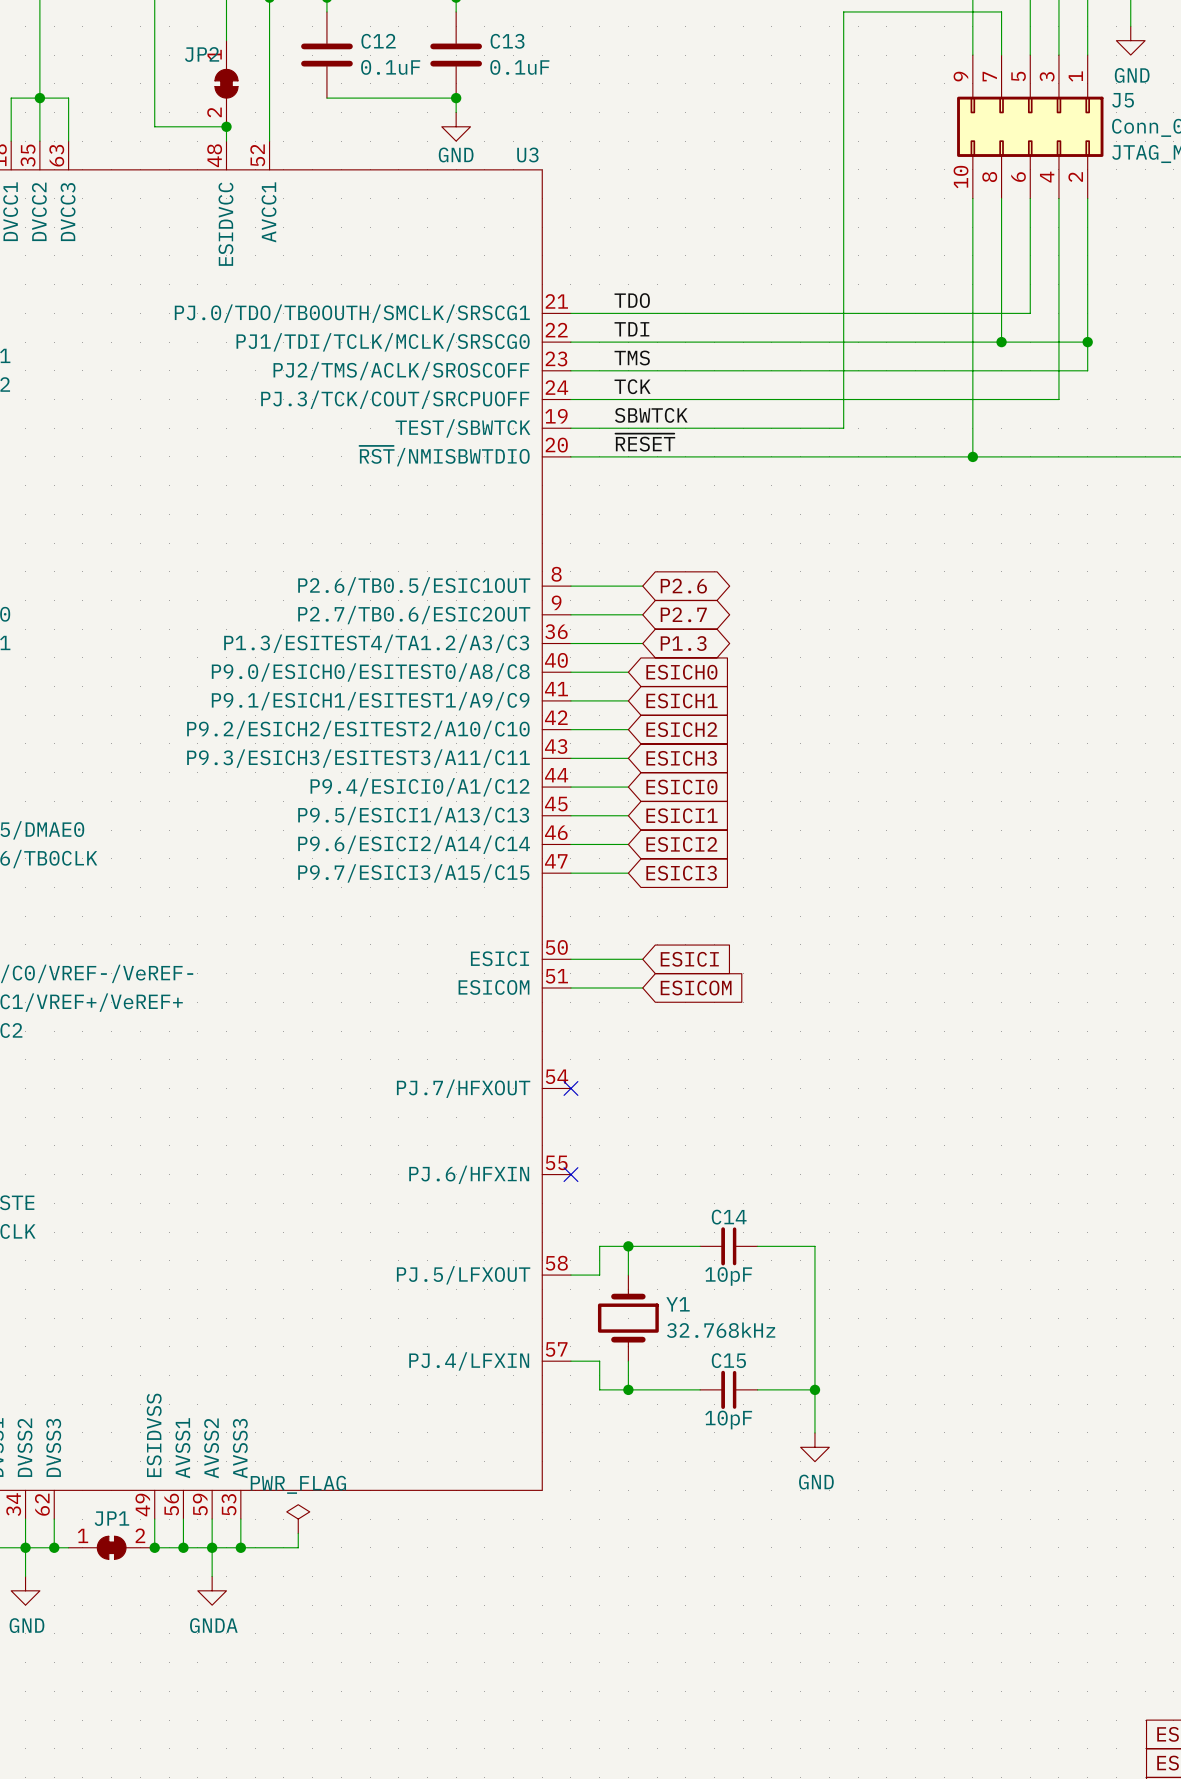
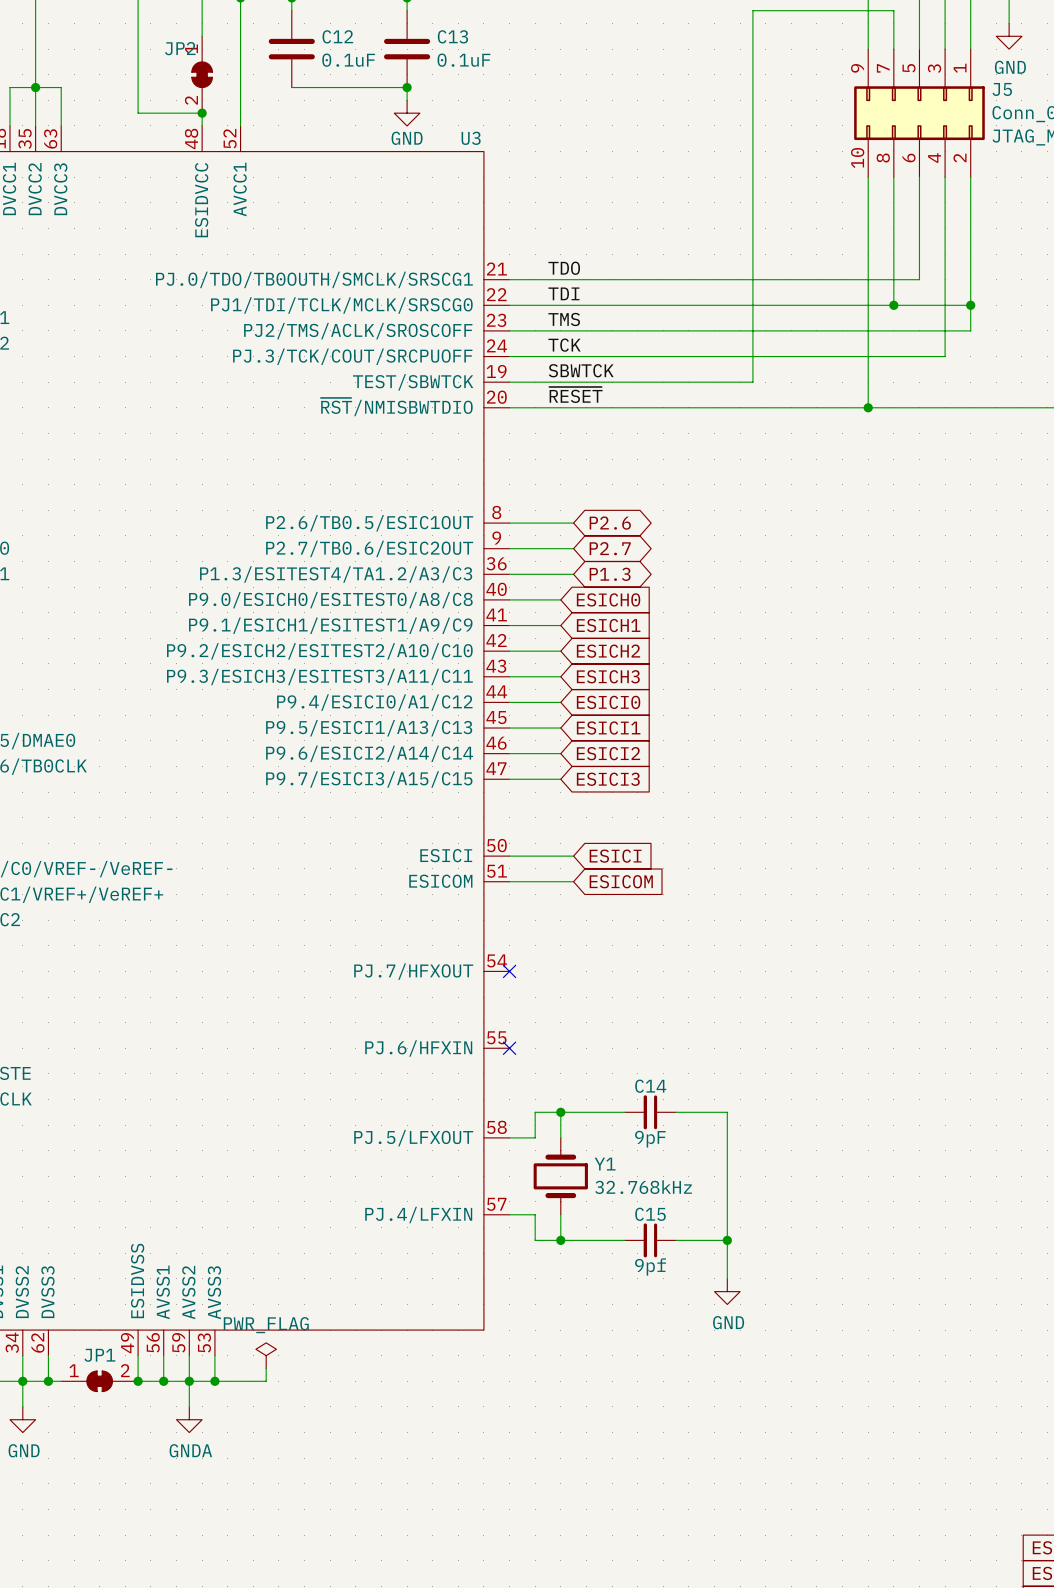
C14 value: 10pF (728, 1276) -> 9pF (650, 1139)
C15 value: 10pF (728, 1419) -> 9pf (650, 1266)

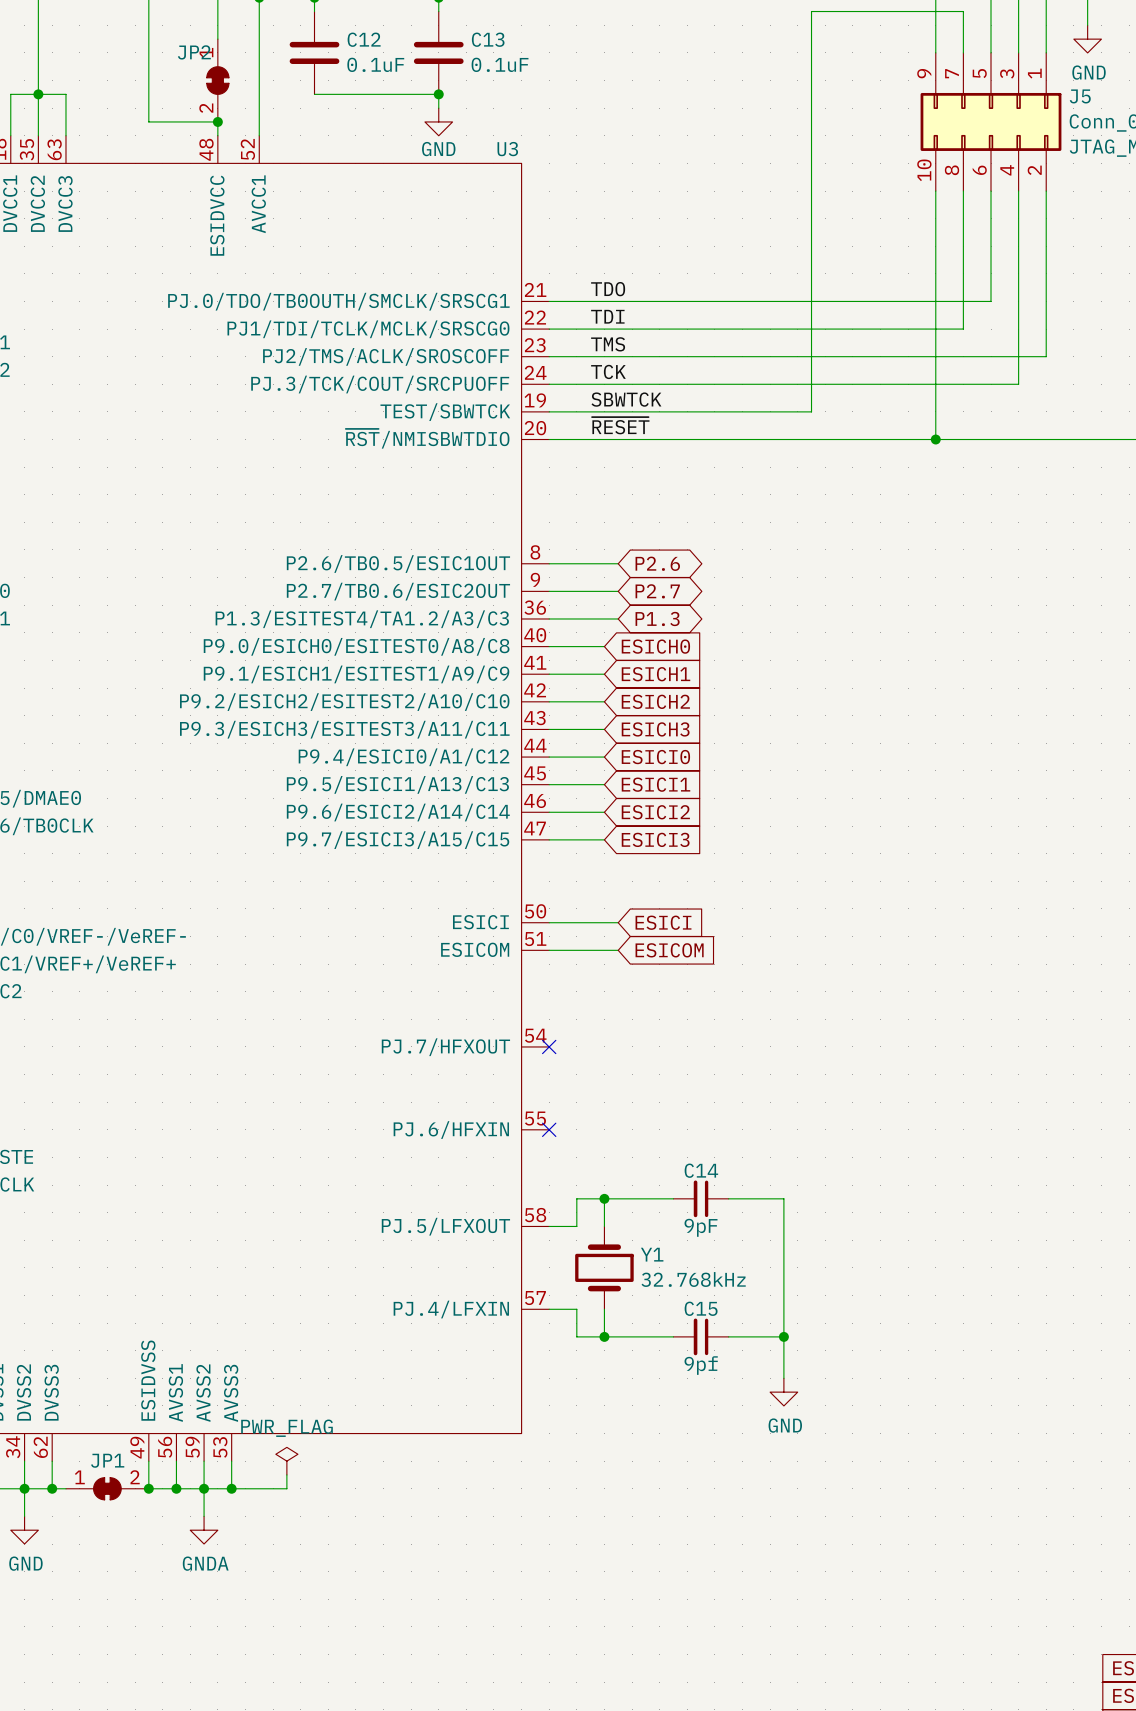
wire: (893, 305) (970, 305) -> none
junction: (893, 305) -> none
junction: (970, 305) -> none

